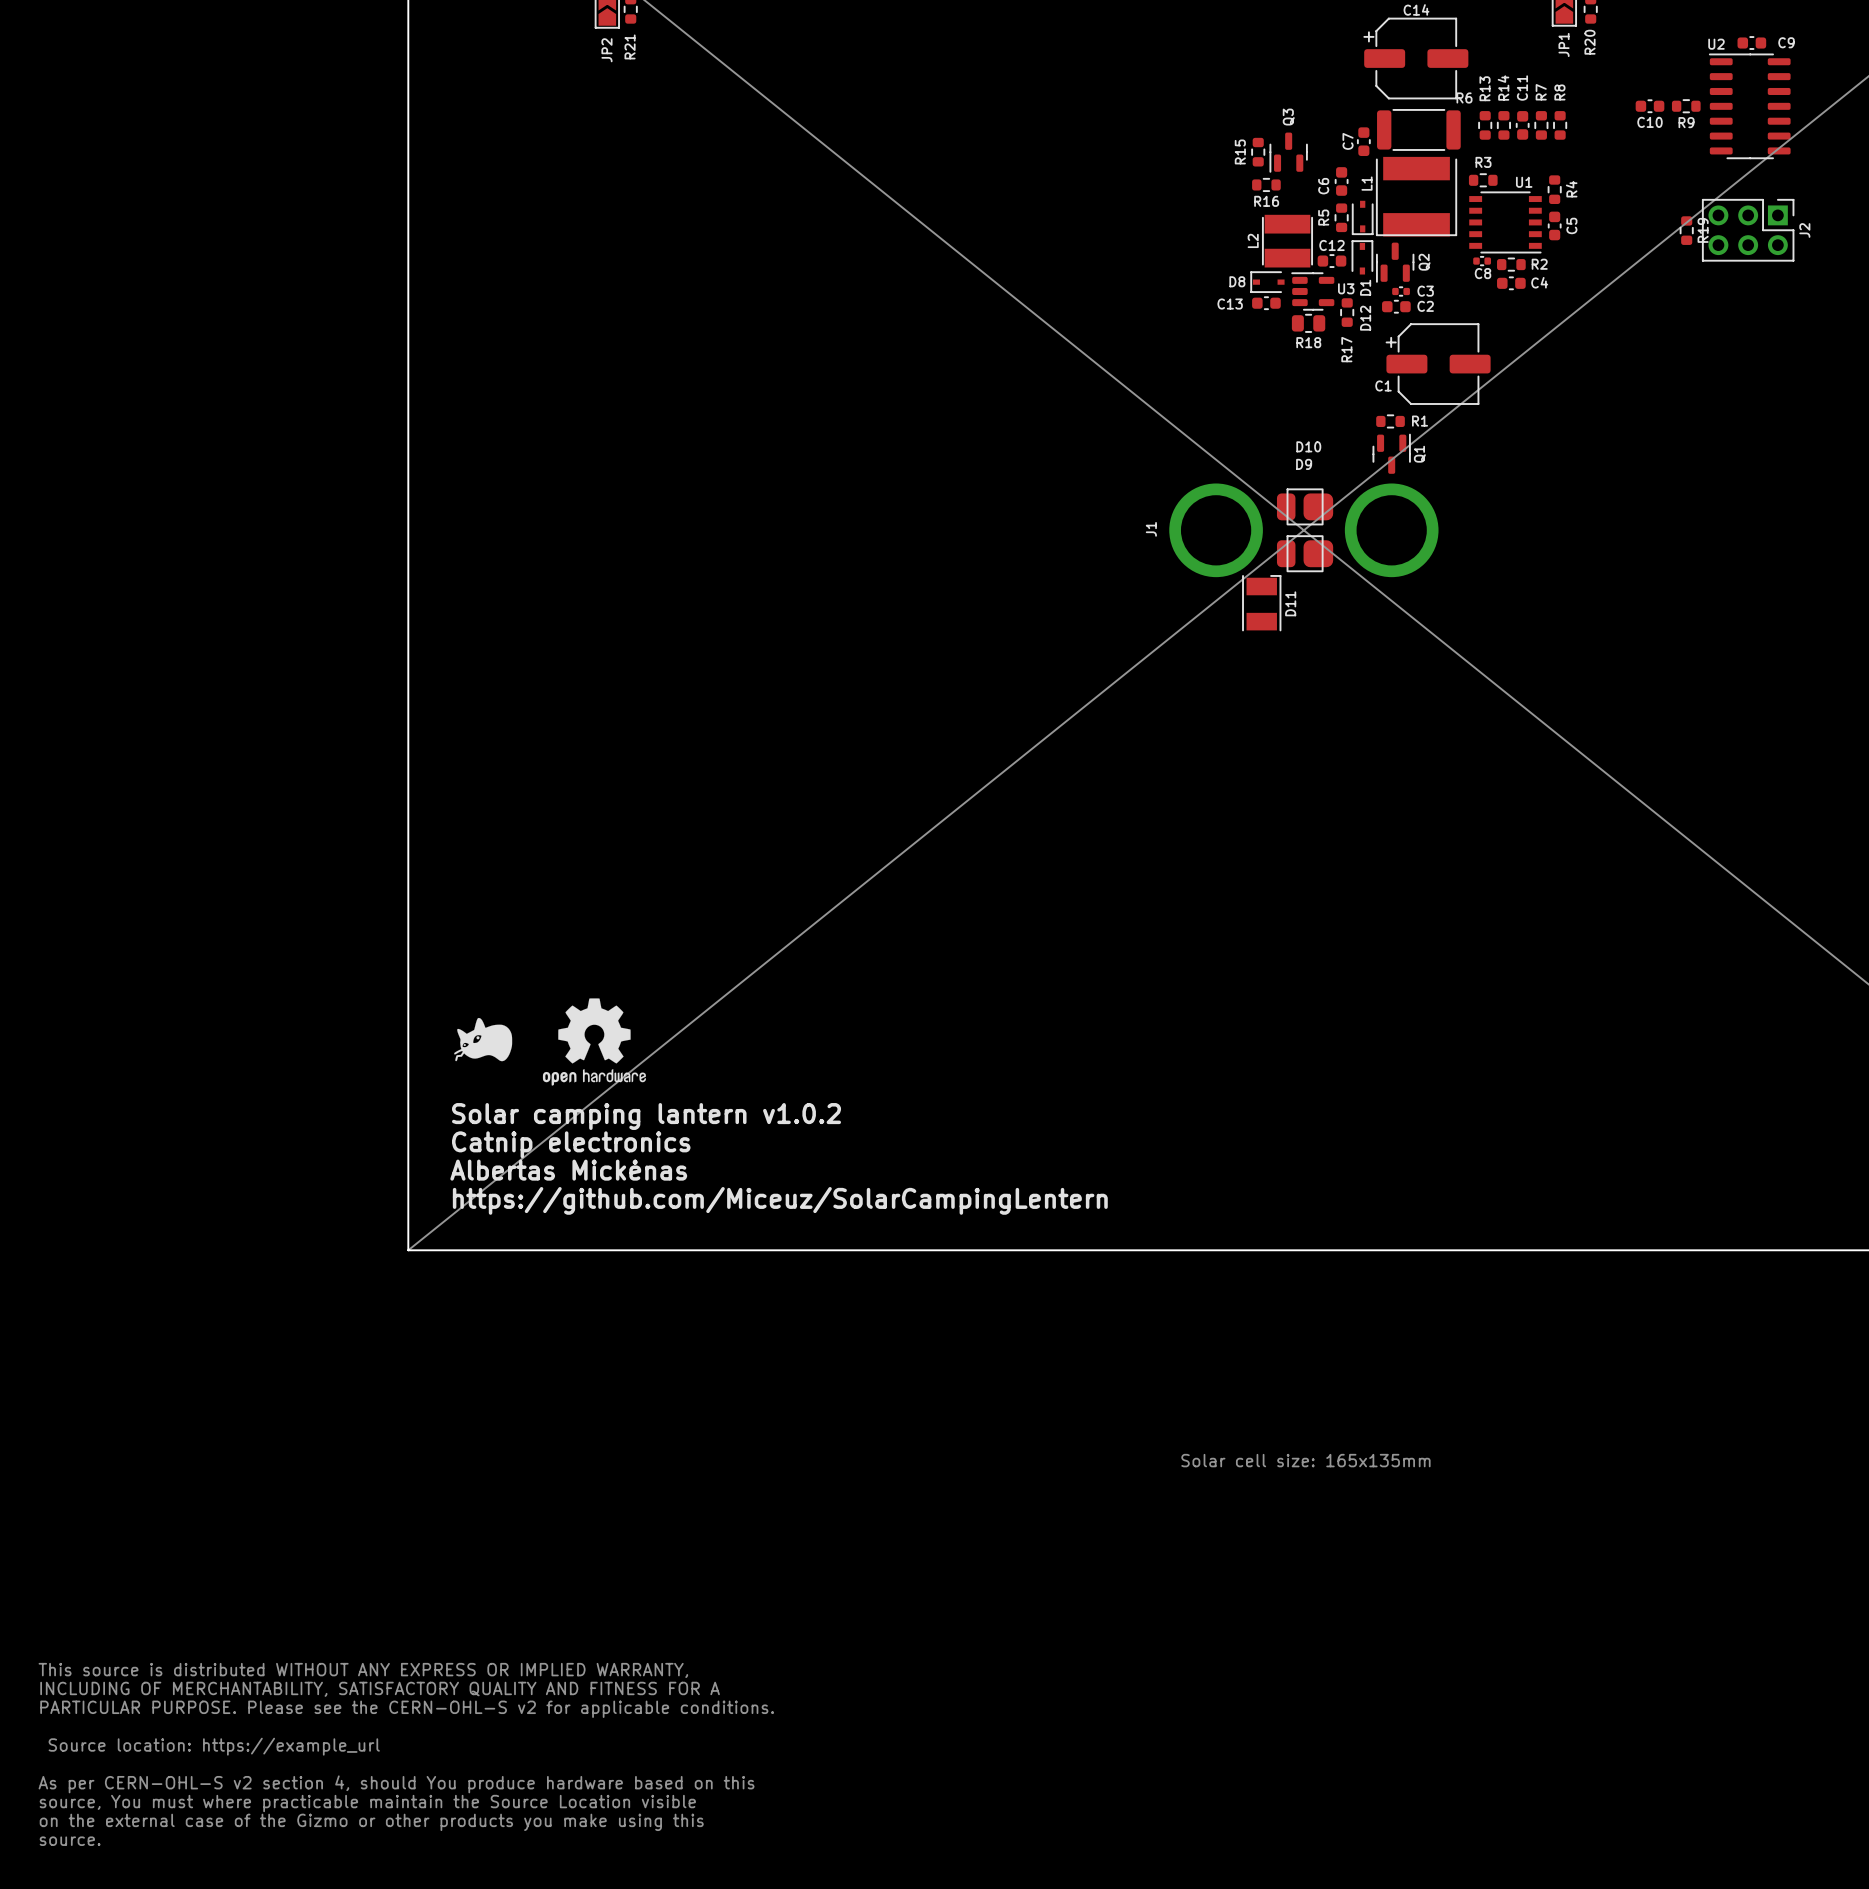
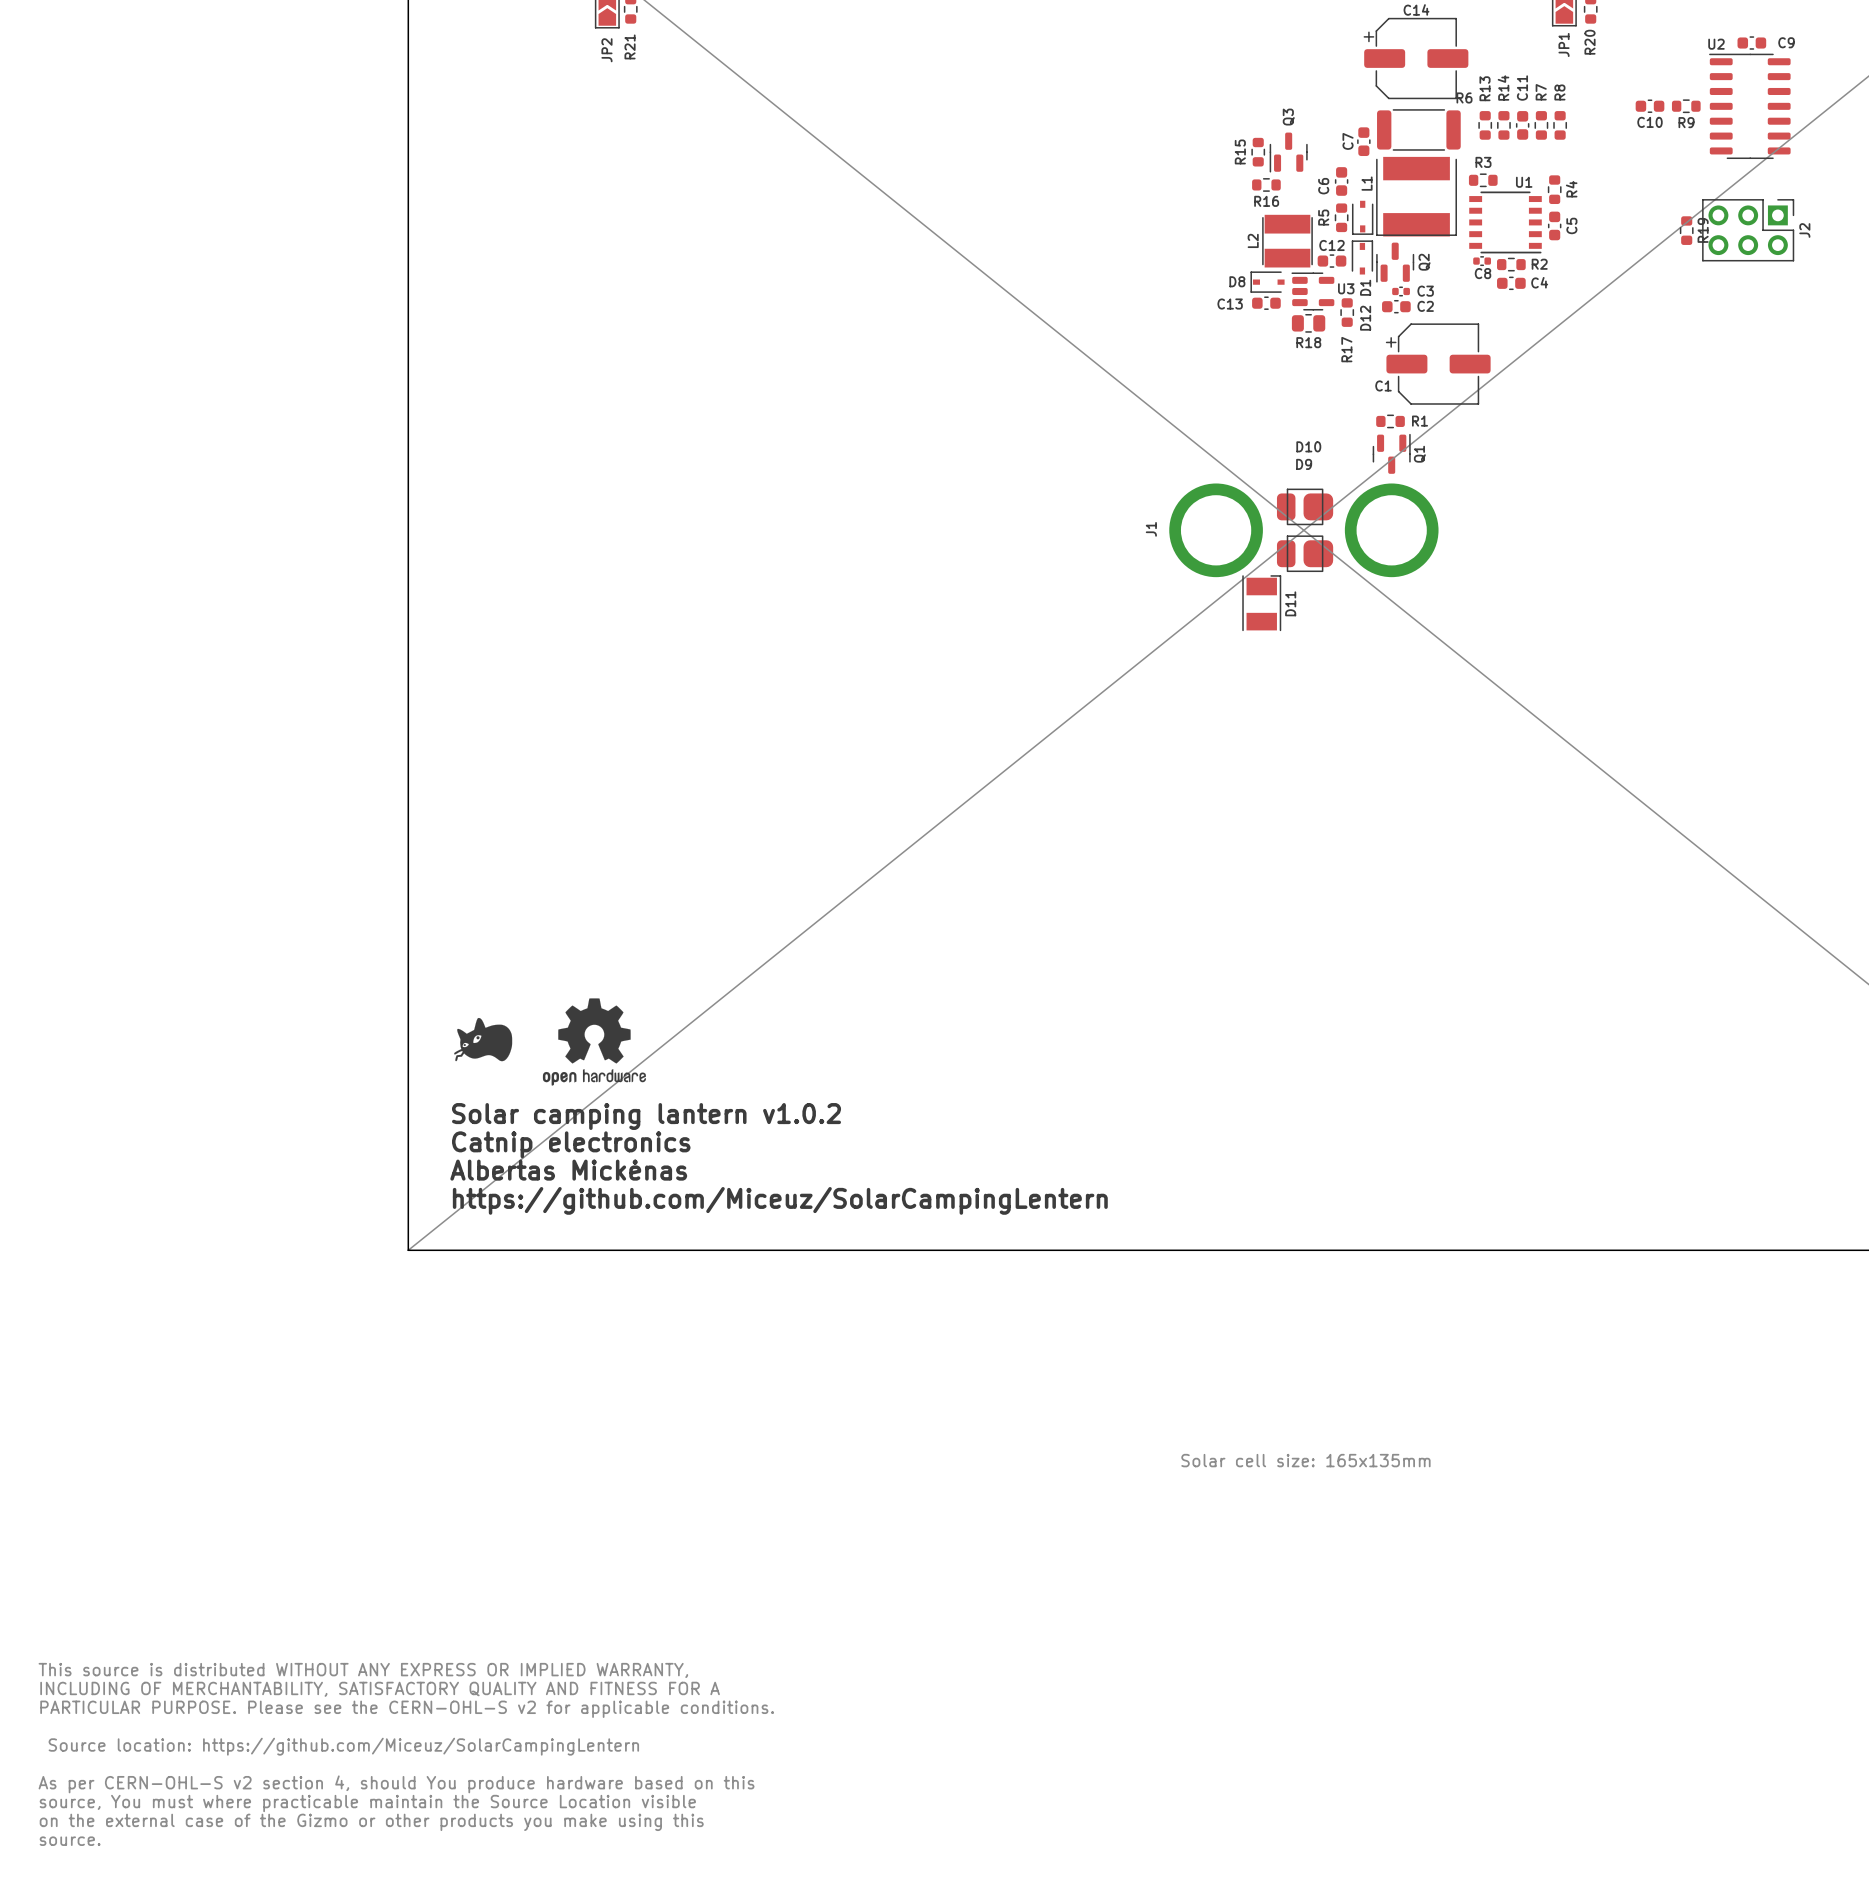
text: Source location: https://example_url (214, 1746) -> Source location: https://github.com/Miceuz/SolarCampingLentern (343, 1746)

